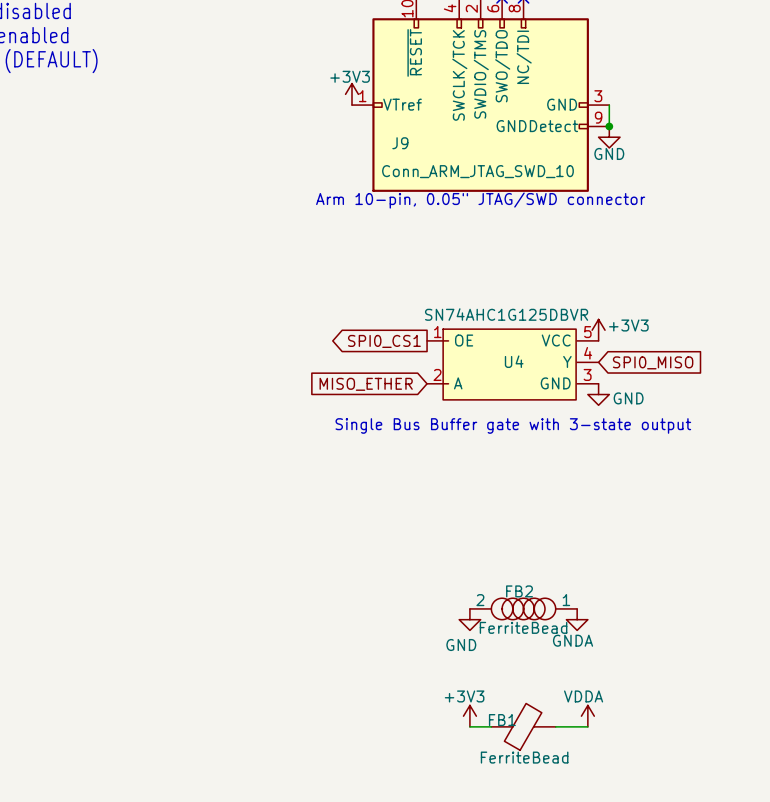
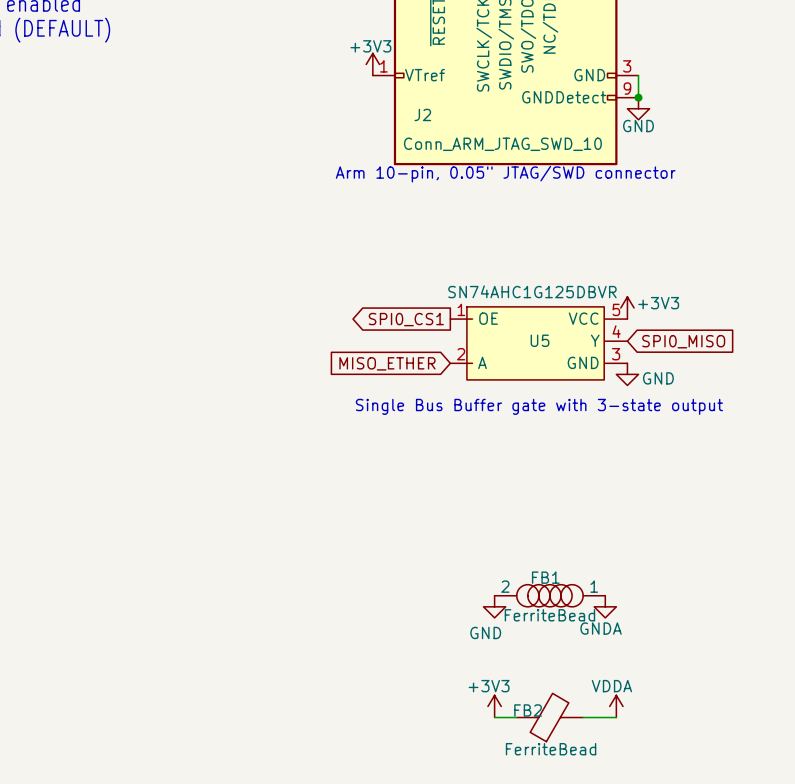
J9 name: J9 (400, 143) -> J2 (422, 114)
U4 name: U4 (514, 361) -> U5 (540, 340)
FB2 name: FB2 (519, 591) -> FB1 (545, 577)
FB1 name: FB1 (502, 720) -> FB2 (528, 710)

